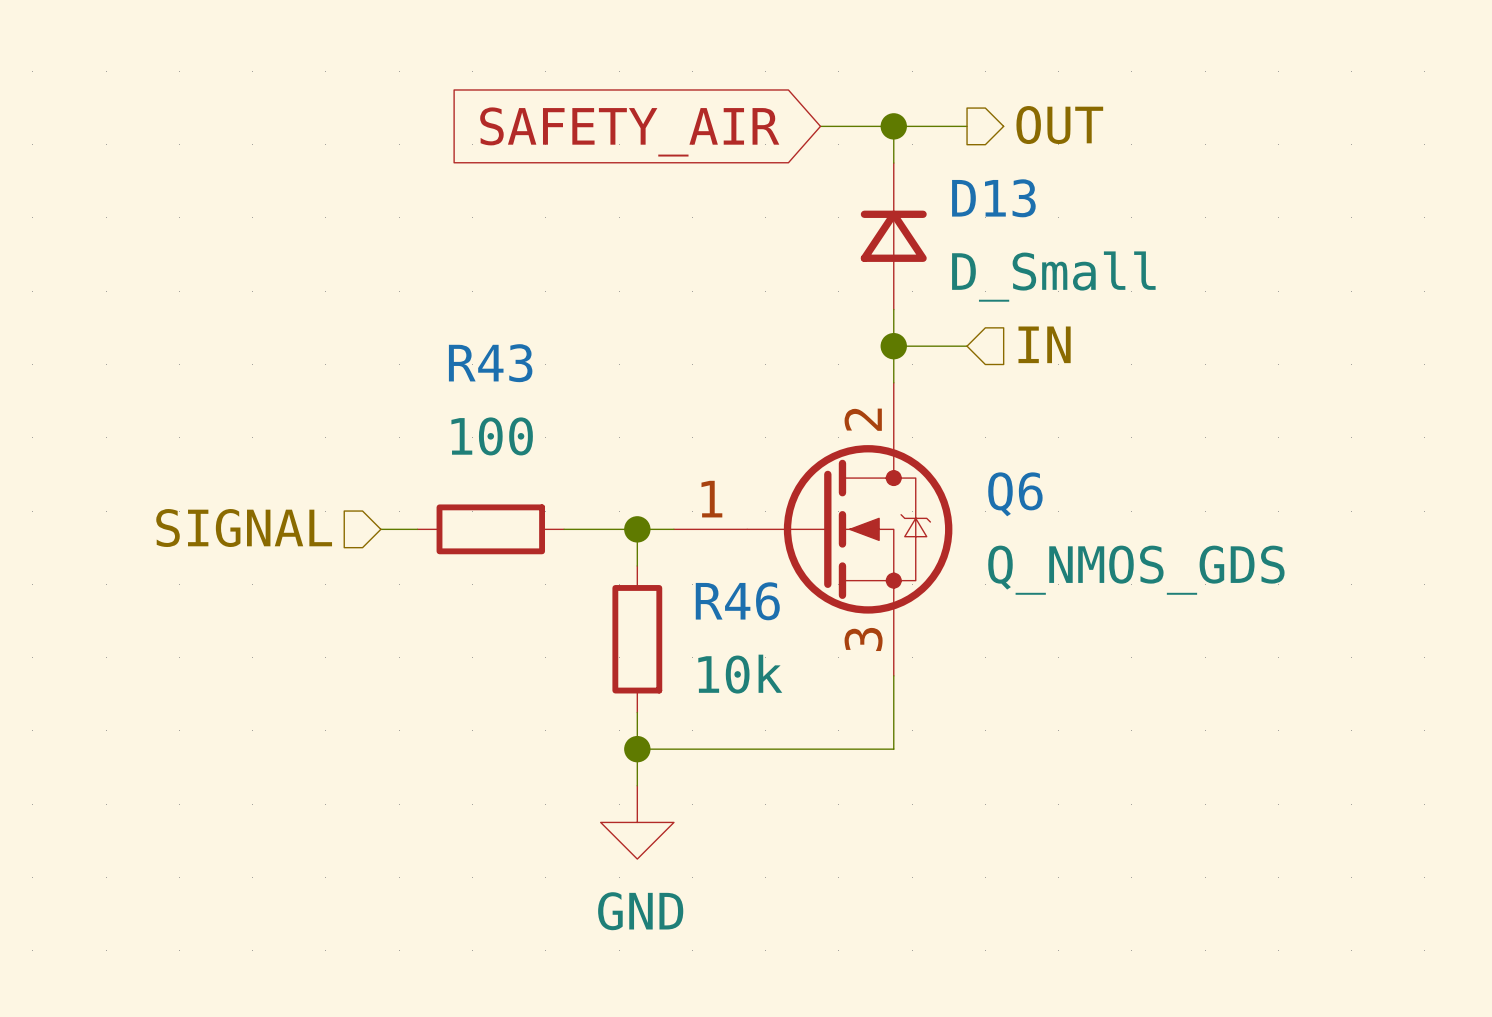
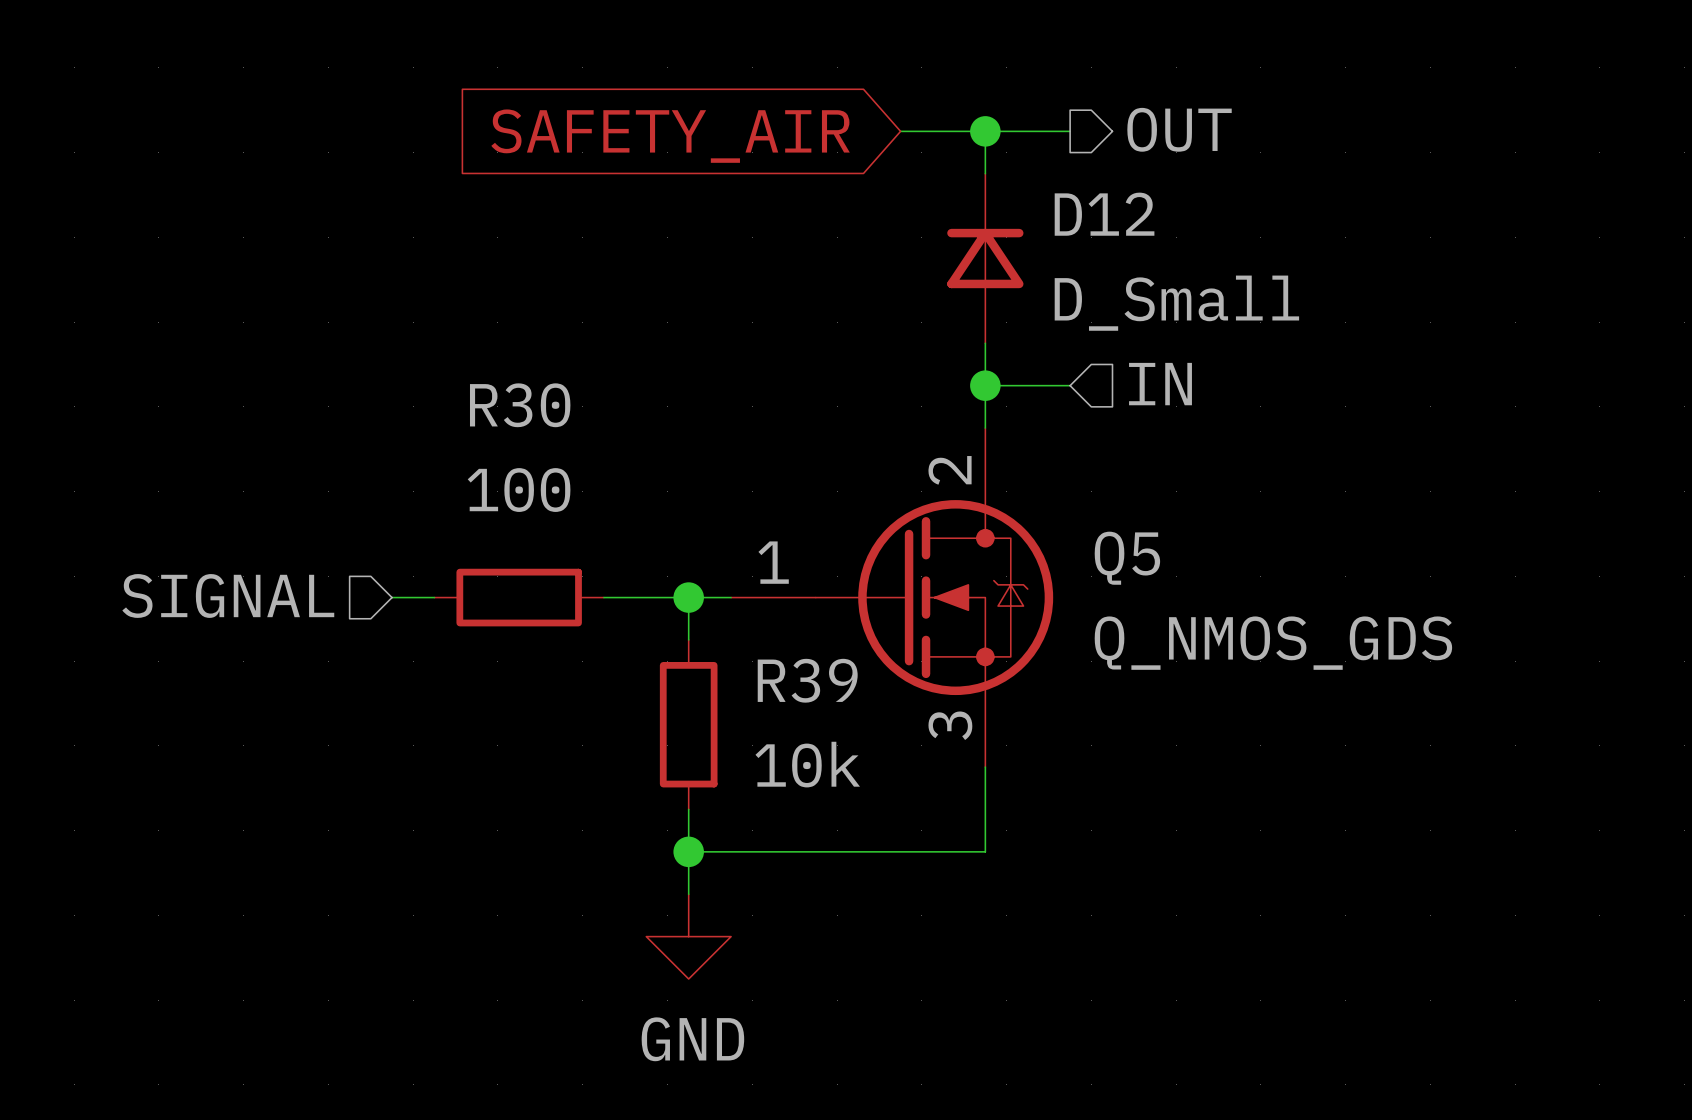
D13 name: D13 (993, 198) -> D12 (1104, 214)
R43 name: R43 (490, 363) -> R30 (520, 405)
Q6 name: Q6 (1015, 494) -> Q5 (1127, 558)
R46 name: R46 (737, 601) -> R39 (807, 680)

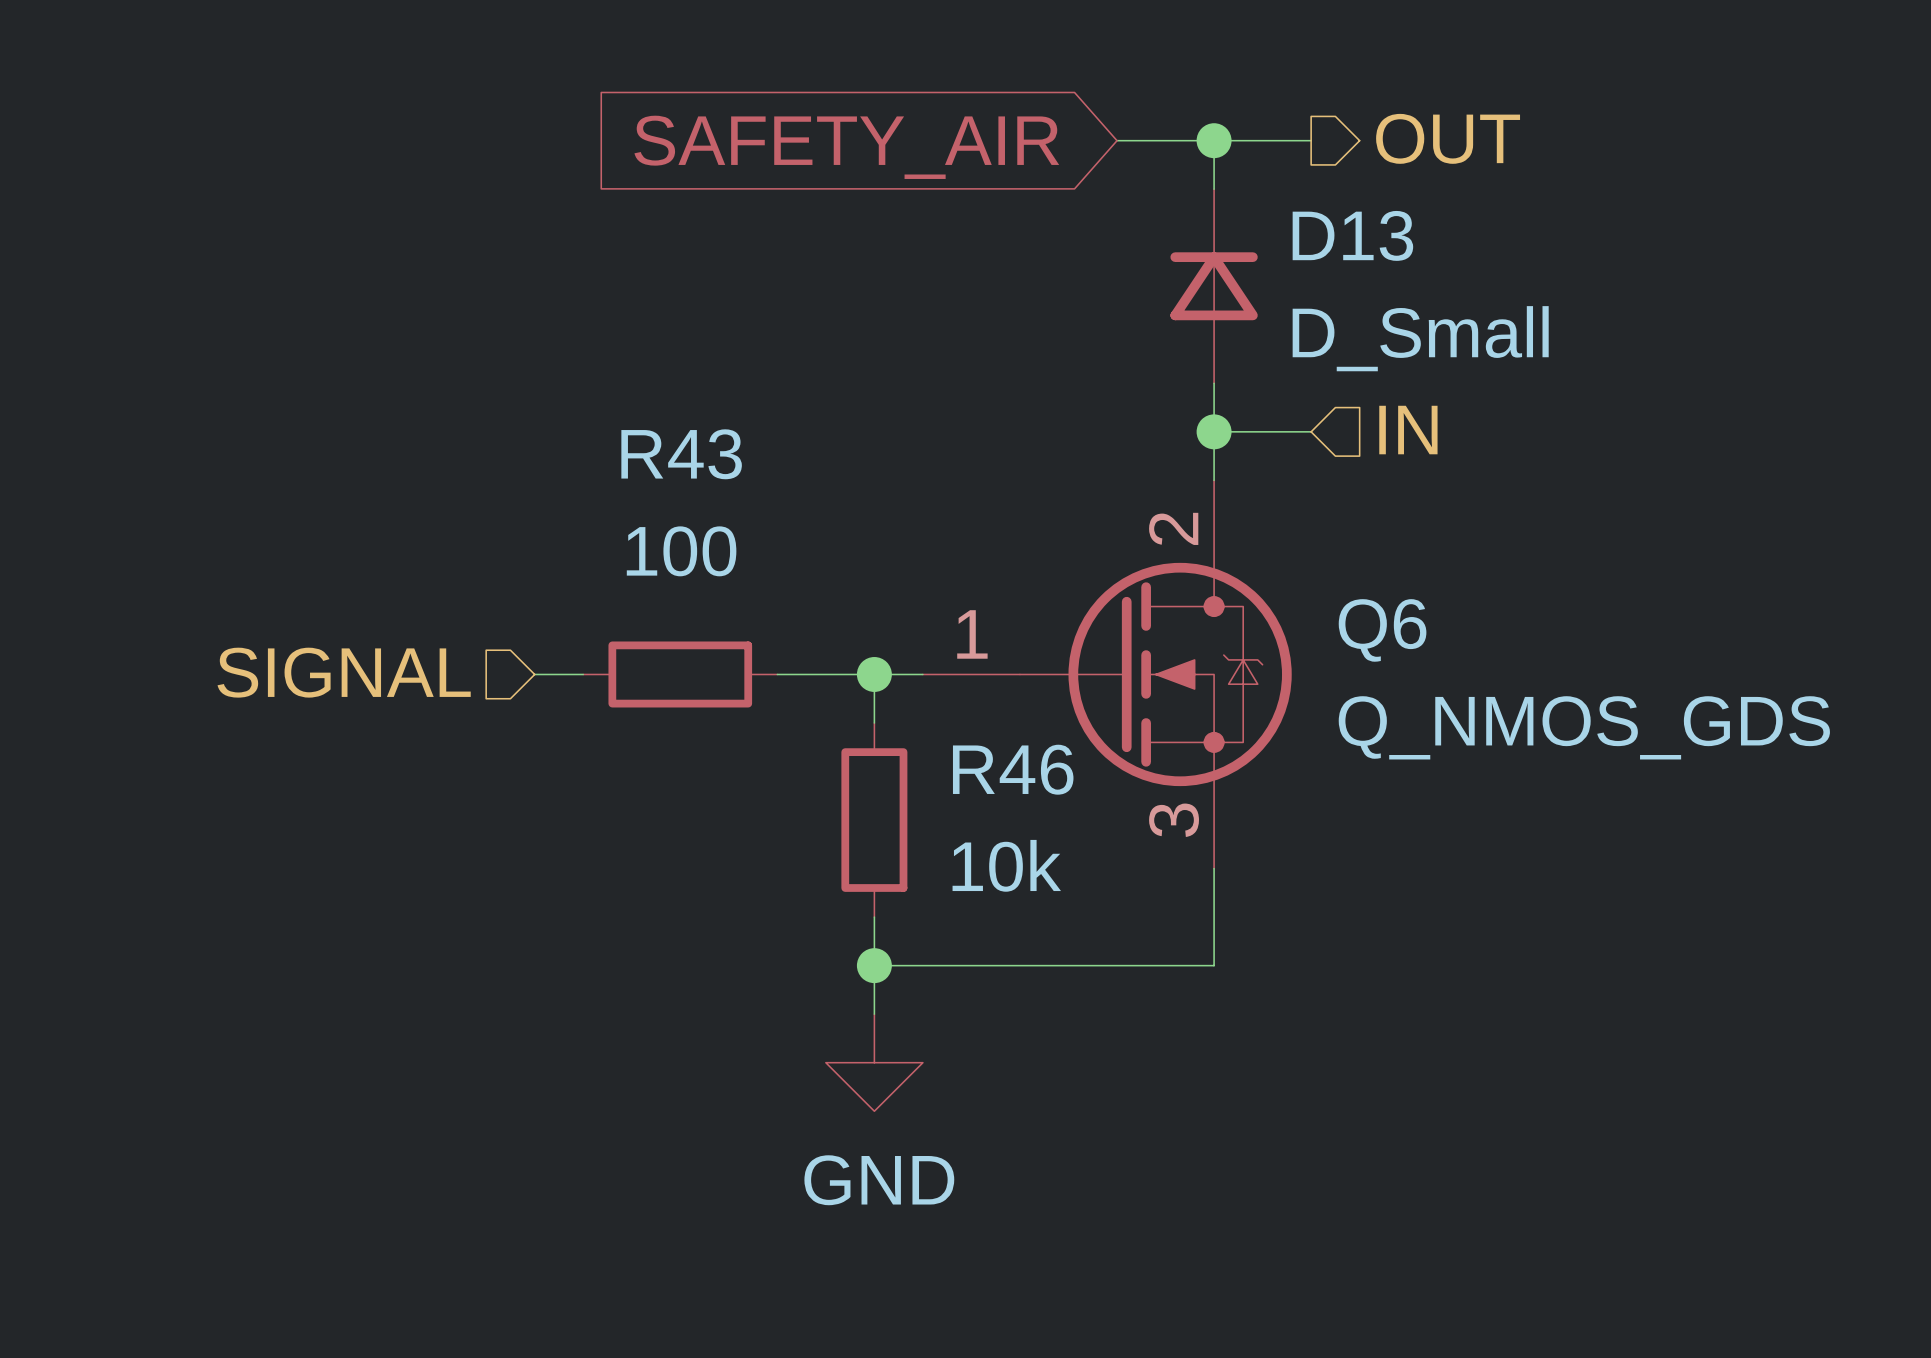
D12 name: D12 (1104, 214) -> D13 (1352, 235)
R30 name: R30 (520, 405) -> R43 (681, 454)
Q5 name: Q5 (1127, 558) -> Q6 (1382, 630)
R39 name: R39 (807, 680) -> R46 (1013, 769)

